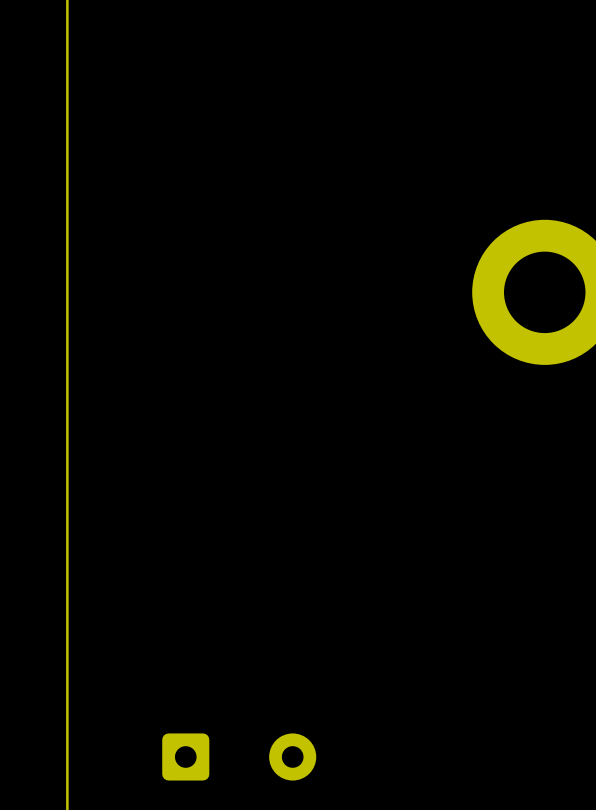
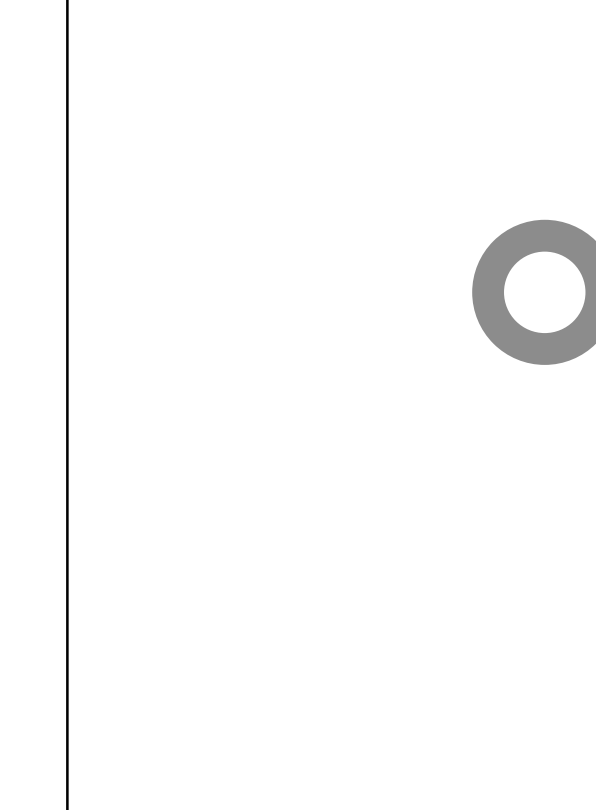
part: (239, 756) -> none

